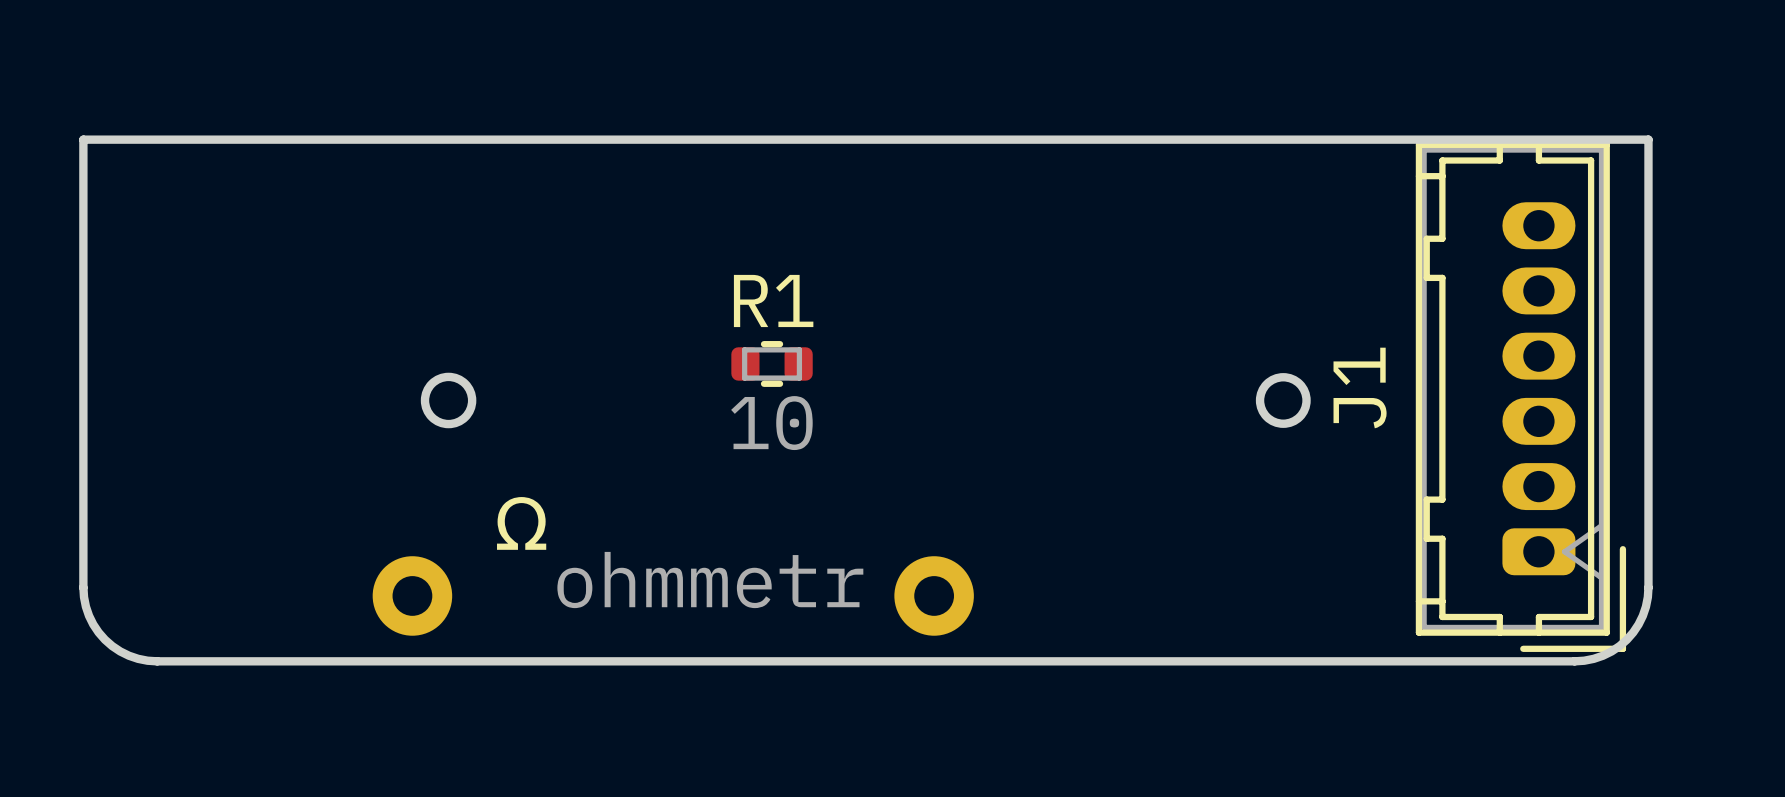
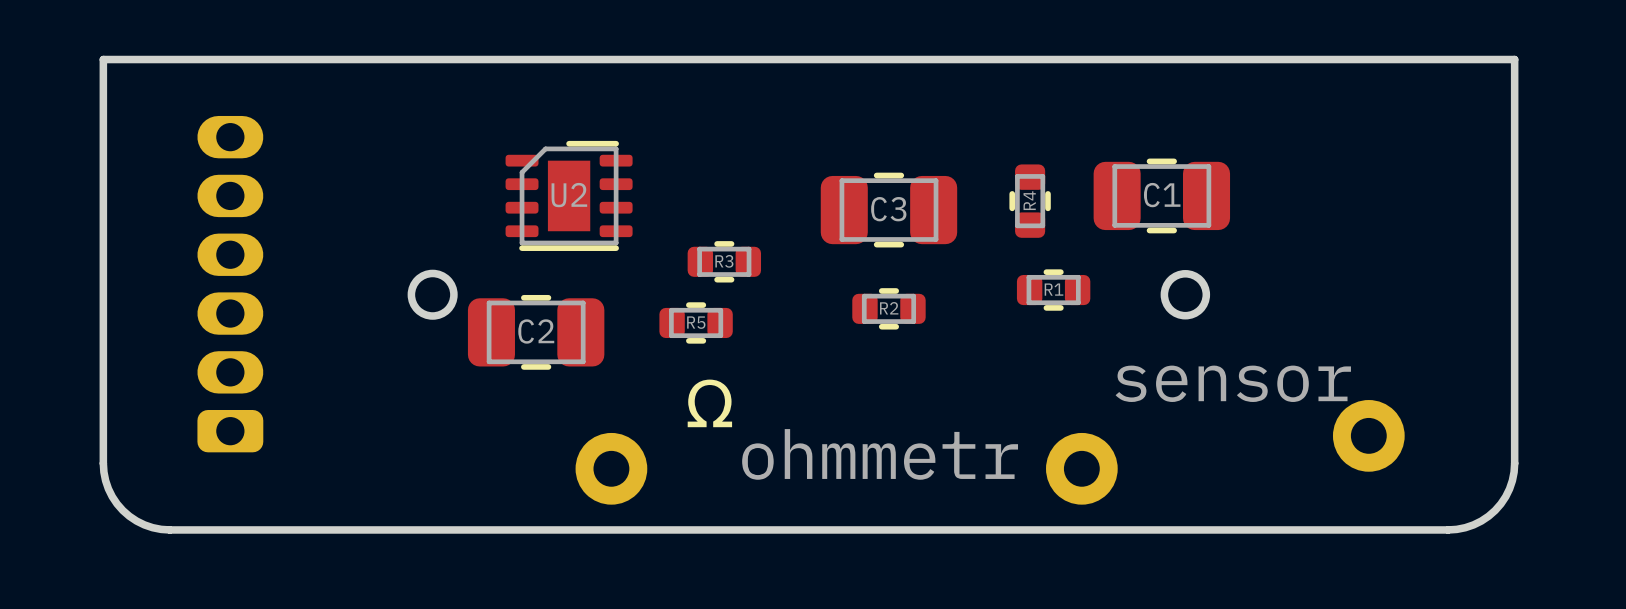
U2: none -> (569, 195)
C1: none -> (1161, 195)
R4: none -> (1030, 201)
R1 name: R1 (773, 300) -> R3 (724, 261)
C3: none -> (888, 210)
R1: none -> (1053, 290)
J1 side: top (1520, 396) -> bottom (230, 284)
R2: none -> (888, 308)
R1 value: 10 (771, 423) -> none
R5: none -> (696, 322)
C2: none -> (536, 332)
part: none -> sensor (1368, 435)
part position: (673, 595) -> (846, 468)

